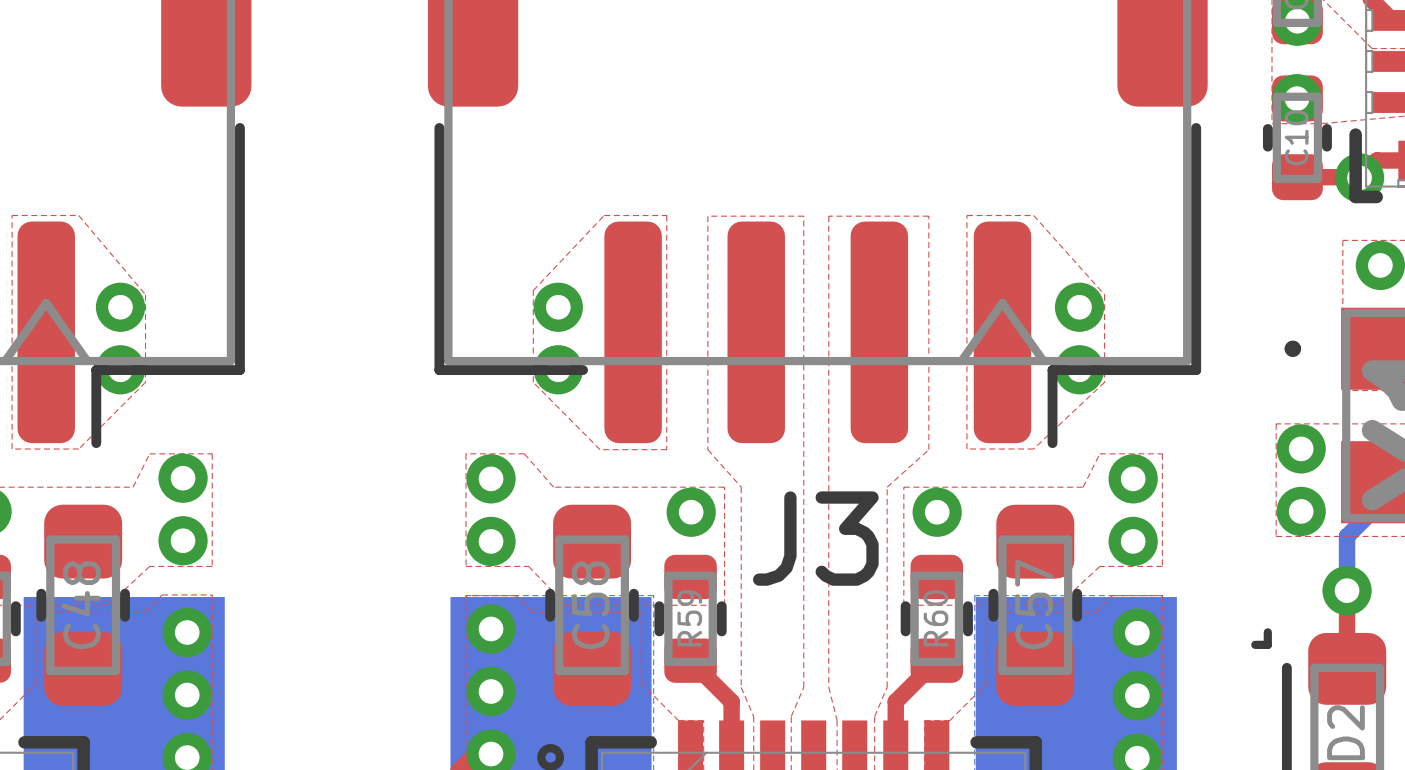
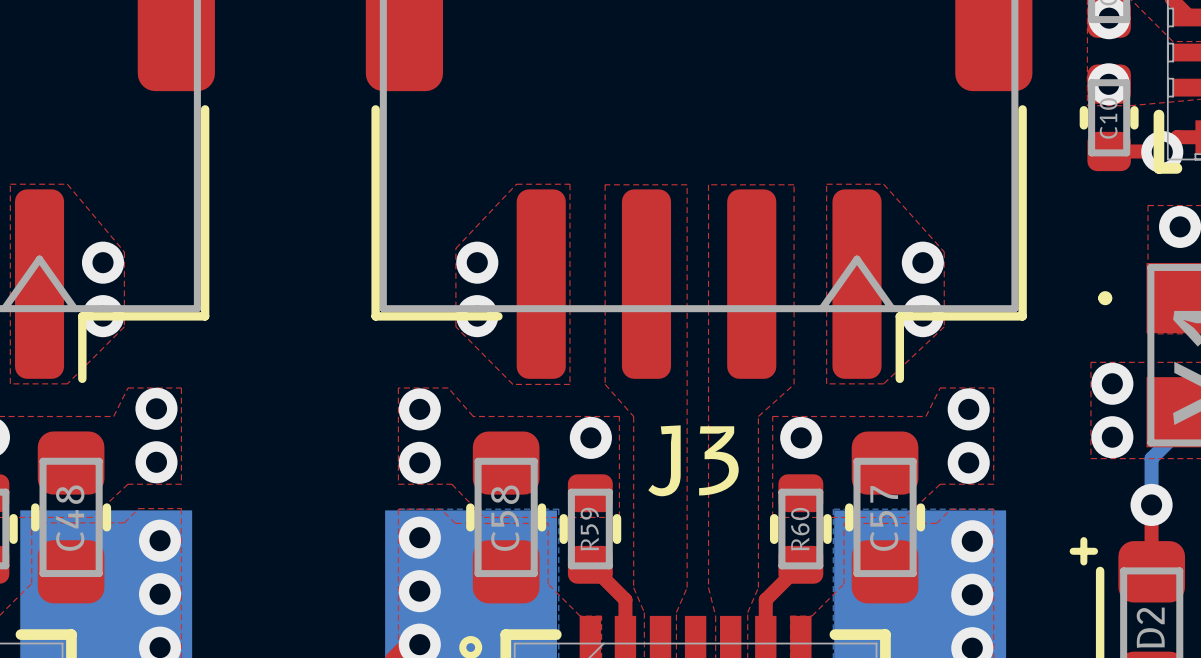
line: none -> (1094, 551) (1083, 551) (1083, 561)

